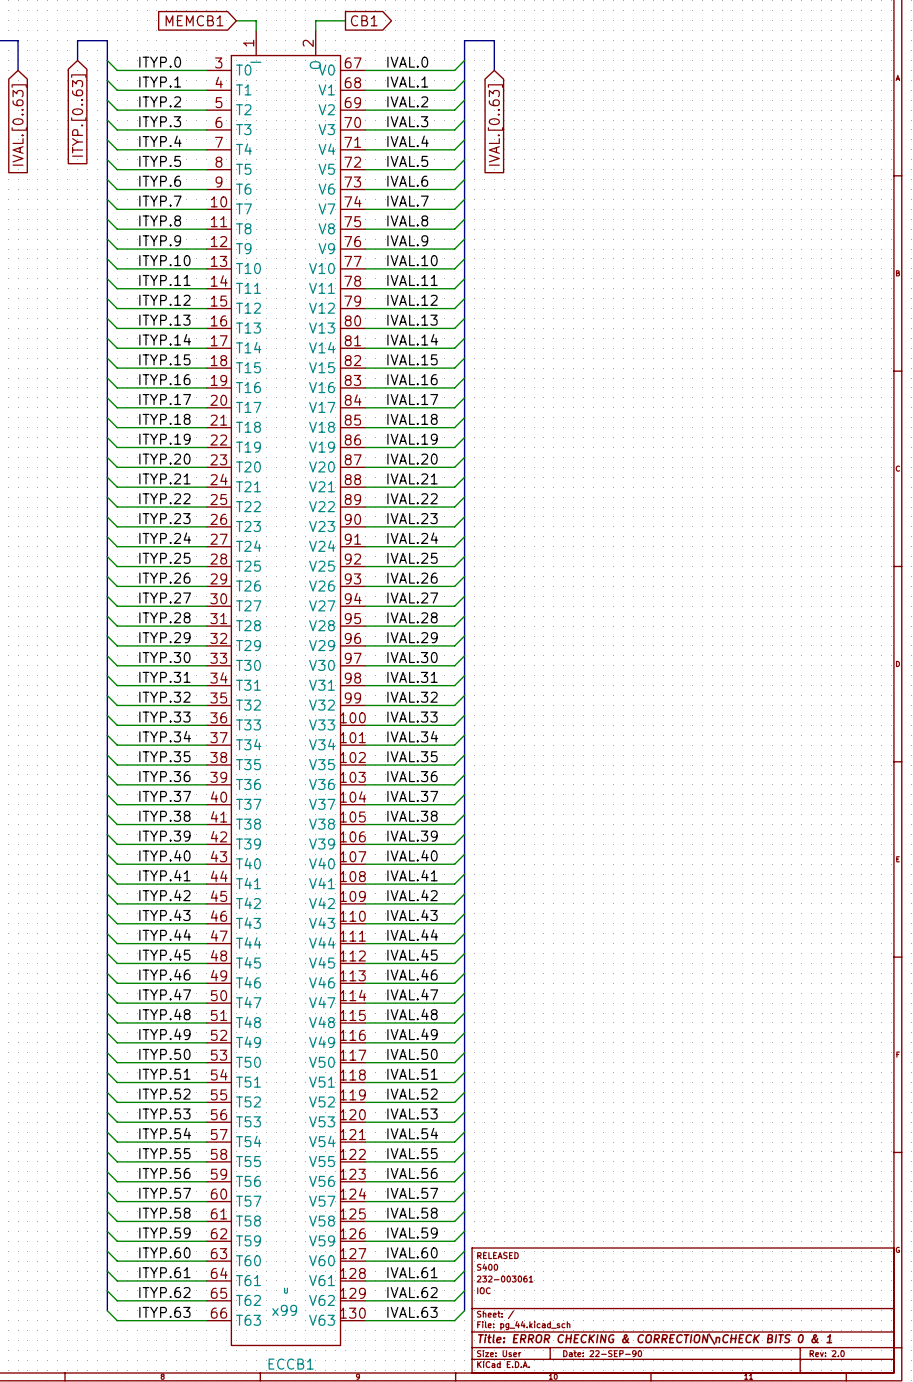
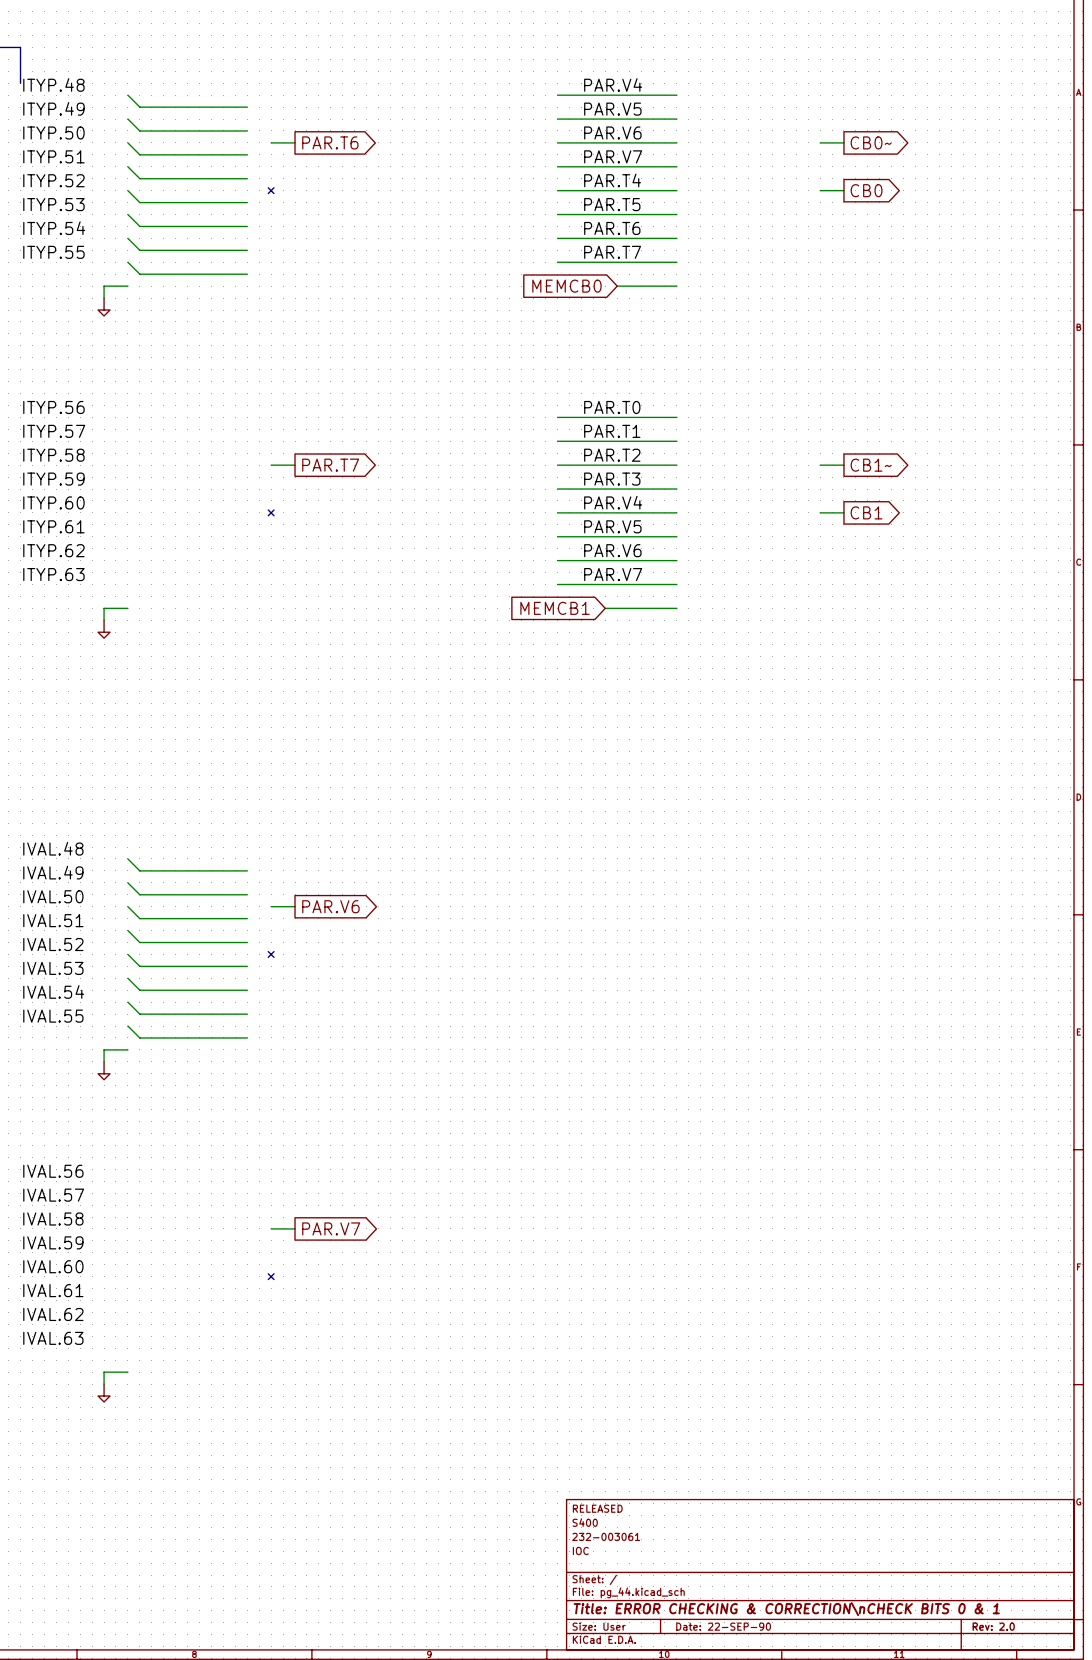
global label: MEMCB1 (194, 20) -> none
wire: (236, 20) (256, 20) (256, 30) -> none
wire: (345, 20) (315, 20) (315, 30) -> none
global label: CB1 (364, 20) -> none
bus: (77, 60) (77, 40) (107, 40) (107, 1310) -> none
wire: (107, 60) (117, 70) (206, 70) -> none
wire: (464, 60) (454, 70) (365, 70) -> none
label: ITYP.0 (160, 62) -> none
label: IVAL.0 (407, 62) -> none
bus: (494, 70) (494, 40) (464, 40) (464, 1310) -> none
label: none -> ITYP.48 (53, 84)
label: none -> PAR.V4 (613, 84)
wire: (464, 80) (454, 90) (365, 90) -> (557, 95) (676, 95)
label: ITYP.1 (160, 82) -> none
label: IVAL.1 (407, 82) -> none
label: none -> ITYP.49 (53, 108)
label: none -> PAR.V5 (612, 109)
wire: (464, 100) (454, 110) (365, 110) -> (557, 119) (676, 119)
label: ITYP.2 (160, 101) -> none
label: IVAL.2 (407, 101) -> none
label: none -> ITYP.50 (53, 132)
label: none -> PAR.V6 (612, 132)
global label: ITYP.[0..63] (78, 115) -> none
wire: none -> (271, 142) (295, 142)
global label: none -> PAR.T6 (330, 142)
wire: (464, 120) (454, 129) (365, 129) -> (557, 142) (676, 142)
wire: none -> (820, 142) (843, 142)
global label: none -> CB0~ (871, 142)
label: ITYP.3 (160, 121) -> none
label: IVAL.3 (407, 121) -> none
global label: IVAL.[0..63] (19, 124) -> none
global label: IVAL.[0..63] (495, 124) -> none
label: none -> ITYP.51 (53, 156)
label: none -> PAR.V7 (613, 156)
wire: (464, 139) (454, 149) (365, 149) -> (557, 166) (676, 166)
label: ITYP.4 (160, 141) -> none
label: IVAL.4 (408, 141) -> none
label: none -> ITYP.52 (53, 180)
label: none -> PAR.T4 (612, 180)
no-connect mark: none -> (271, 190)
wire: (464, 159) (454, 169) (365, 169) -> (557, 190) (676, 190)
wire: none -> (820, 190) (843, 190)
global label: none -> CB0 (866, 190)
label: ITYP.5 (160, 161) -> none
label: IVAL.5 (407, 161) -> none
label: none -> ITYP.53 (53, 204)
label: none -> PAR.T5 (612, 204)
wire: (464, 179) (454, 189) (365, 189) -> (557, 214) (676, 214)
label: ITYP.6 (160, 181) -> none
label: IVAL.6 (407, 181) -> none
label: none -> ITYP.54 (54, 228)
label: none -> PAR.T6 (612, 228)
wire: (464, 199) (454, 209) (365, 209) -> (557, 238) (676, 238)
label: ITYP.7 (160, 201) -> none
label: IVAL.7 (408, 201) -> none
label: none -> ITYP.55 (53, 252)
label: none -> PAR.T7 (612, 252)
wire: (464, 219) (454, 229) (365, 229) -> (557, 262) (676, 262)
label: ITYP.8 (160, 220) -> none
label: IVAL.8 (407, 220) -> none
wire: (107, 239) (117, 249) (206, 249) -> (127, 286) (104, 286) (104, 298)
wire: (464, 239) (454, 249) (365, 249) -> none
global label: none -> MEMCB0 (566, 286)
wire: none -> (617, 286) (676, 286)
label: ITYP.9 (160, 240) -> none
label: IVAL.9 (407, 240) -> none
power symbol: none -> (104, 307)
wire: (107, 258) (117, 268) (206, 268) -> none
wire: (464, 258) (454, 268) (365, 268) -> none
label: ITYP.10 (164, 260) -> none
label: IVAL.10 (412, 260) -> none
wire: (107, 278) (117, 288) (206, 288) -> none
wire: (464, 278) (454, 288) (365, 288) -> none
label: ITYP.11 (164, 280) -> none
label: IVAL.11 (412, 280) -> none
wire: (107, 298) (117, 308) (206, 308) -> none
wire: (464, 298) (454, 308) (365, 308) -> none
label: ITYP.12 (164, 300) -> none
label: IVAL.12 (412, 300) -> none
wire: (107, 318) (117, 328) (206, 328) -> none
wire: (464, 318) (454, 328) (365, 328) -> none
label: ITYP.13 (164, 320) -> none
label: IVAL.13 (412, 320) -> none
wire: (107, 338) (117, 348) (206, 348) -> none
wire: (464, 338) (454, 348) (365, 348) -> none
label: ITYP.14 (165, 339) -> none
label: IVAL.14 (412, 339) -> none
label: none -> ITYP.56 (53, 407)
label: none -> PAR.T0 (612, 407)
wire: none -> (557, 417) (676, 417)
wire: (107, 358) (117, 368) (206, 368) -> none
wire: (464, 358) (454, 368) (365, 368) -> none
label: none -> ITYP.57 (54, 431)
label: ITYP.15 (164, 359) -> none
label: IVAL.15 (412, 359) -> none
label: none -> PAR.T1 (612, 431)
wire: none -> (557, 441) (676, 441)
wire: (107, 378) (117, 387) (206, 387) -> none
wire: (464, 378) (454, 387) (365, 387) -> none
label: none -> ITYP.58 (53, 455)
label: ITYP.16 (164, 379) -> none
label: IVAL.16 (412, 379) -> none
label: none -> PAR.T2 (612, 455)
wire: none -> (271, 465) (295, 465)
global label: none -> PAR.T7 (330, 465)
wire: none -> (557, 465) (676, 465)
wire: none -> (820, 465) (843, 465)
global label: none -> CB1~ (871, 465)
wire: (107, 397) (117, 407) (206, 407) -> none
wire: (464, 397) (454, 407) (365, 407) -> none
label: none -> ITYP.59 (53, 479)
label: ITYP.17 (165, 399) -> none
label: IVAL.17 (412, 399) -> none
label: none -> PAR.T3 (612, 479)
wire: none -> (557, 489) (676, 489)
wire: (107, 417) (117, 427) (206, 427) -> none
wire: (464, 417) (454, 427) (365, 427) -> none
label: none -> ITYP.60 (53, 502)
label: ITYP.18 (164, 419) -> none
label: IVAL.18 (412, 419) -> none
label: none -> PAR.V4 (613, 502)
no-connect mark: none -> (271, 512)
wire: none -> (557, 512) (676, 512)
wire: none -> (820, 512) (843, 512)
global label: none -> CB1 (866, 512)
wire: (107, 437) (117, 447) (206, 447) -> none
wire: (464, 437) (454, 447) (365, 447) -> none
label: none -> ITYP.61 (53, 526)
label: ITYP.19 (164, 439) -> none
label: IVAL.19 (412, 439) -> none
label: none -> PAR.V5 (612, 526)
wire: none -> (557, 536) (676, 536)
wire: (107, 457) (117, 467) (206, 467) -> none
wire: (464, 457) (454, 467) (365, 467) -> none
label: none -> ITYP.62 (53, 550)
label: ITYP.20 (164, 459) -> none
label: IVAL.20 (412, 459) -> none
label: none -> PAR.V6 (612, 550)
wire: none -> (557, 560) (676, 560)
wire: (107, 477) (117, 487) (206, 487) -> none
wire: (464, 477) (454, 487) (365, 487) -> none
label: none -> ITYP.63 (53, 574)
label: ITYP.21 (164, 478) -> none
label: IVAL.21 (412, 478) -> none
label: none -> PAR.V7 (613, 574)
wire: none -> (557, 584) (676, 584)
wire: (107, 497) (117, 507) (206, 507) -> none
wire: (464, 497) (454, 507) (365, 507) -> none
label: ITYP.22 (164, 498) -> none
label: IVAL.22 (412, 498) -> none
wire: none -> (127, 608) (104, 608) (104, 620)
global label: none -> MEMCB1 (555, 608)
wire: none -> (605, 608) (676, 608)
wire: (107, 516) (117, 526) (206, 526) -> none
wire: (464, 516) (454, 526) (365, 526) -> none
label: ITYP.23 (164, 518) -> none
label: IVAL.23 (412, 518) -> none
power symbol: none -> (104, 629)
wire: (107, 536) (117, 546) (206, 546) -> none
wire: (464, 536) (454, 546) (365, 546) -> none
label: ITYP.24 (165, 538) -> none
label: IVAL.24 (412, 538) -> none
wire: (107, 556) (117, 566) (206, 566) -> none
wire: (464, 556) (454, 566) (365, 566) -> none
label: ITYP.25 (164, 558) -> none
label: IVAL.25 (412, 558) -> none
wire: (107, 576) (117, 586) (206, 586) -> none
wire: (464, 576) (454, 586) (365, 586) -> none
label: ITYP.26 (164, 578) -> none
label: IVAL.26 (412, 578) -> none
wire: (107, 596) (117, 606) (206, 606) -> none
wire: (464, 596) (454, 606) (365, 606) -> none
label: ITYP.27 (165, 597) -> none
label: IVAL.27 (412, 597) -> none
wire: (107, 616) (117, 626) (206, 626) -> none
wire: (464, 616) (454, 626) (365, 626) -> none
label: ITYP.28 (164, 617) -> none
label: IVAL.28 (412, 617) -> none
wire: (107, 636) (117, 645) (206, 645) -> none
wire: (464, 636) (454, 645) (365, 645) -> none
label: ITYP.29 (164, 637) -> none
label: IVAL.29 (412, 637) -> none
wire: (107, 655) (117, 665) (206, 665) -> none
wire: (464, 655) (454, 665) (365, 665) -> none
label: ITYP.30 (164, 657) -> none
label: IVAL.30 (412, 657) -> none
wire: (107, 675) (117, 685) (206, 685) -> none
wire: (464, 675) (454, 685) (365, 685) -> none
label: ITYP.31 (164, 677) -> none
label: IVAL.31 (412, 677) -> none
part: (285, 688) -> none
wire: (107, 695) (117, 705) (206, 705) -> none
wire: (464, 695) (454, 705) (365, 705) -> none
label: ITYP.32 (164, 697) -> none
label: IVAL.32 (412, 697) -> none
label: none -> IVAL.48 (53, 848)
wire: (464, 715) (454, 725) (365, 725) -> none
label: ITYP.33 (164, 717) -> none
label: IVAL.33 (412, 717) -> none
label: none -> IVAL.49 (53, 872)
wire: (464, 735) (454, 745) (365, 745) -> none
label: ITYP.34 (165, 736) -> none
label: IVAL.34 (412, 736) -> none
label: none -> IVAL.50 (53, 896)
wire: none -> (271, 906) (295, 906)
global label: none -> PAR.V6 (330, 906)
wire: (464, 755) (454, 765) (365, 765) -> none
label: ITYP.35 (164, 756) -> none
label: IVAL.35 (412, 756) -> none
label: none -> IVAL.51 (53, 920)
wire: (464, 774) (454, 784) (365, 784) -> none
label: ITYP.36 (164, 776) -> none
label: IVAL.36 (412, 776) -> none
label: none -> IVAL.52 (53, 944)
no-connect mark: none -> (271, 954)
wire: (464, 794) (454, 804) (365, 804) -> none
label: ITYP.37 (165, 796) -> none
label: IVAL.37 (412, 796) -> none
label: none -> IVAL.53 (53, 968)
wire: (464, 814) (454, 824) (365, 824) -> none
label: ITYP.38 (164, 816) -> none
label: IVAL.38 (412, 816) -> none
label: none -> IVAL.54 (53, 991)
wire: (464, 834) (454, 844) (365, 844) -> none
label: ITYP.39 (164, 836) -> none
label: IVAL.39 (412, 836) -> none
label: none -> IVAL.55 (53, 1016)
wire: (464, 854) (454, 864) (365, 864) -> none
label: ITYP.40 (164, 855) -> none
label: IVAL.40 (412, 855) -> none
wire: (107, 874) (117, 884) (206, 884) -> (127, 1049) (104, 1049) (104, 1061)
wire: (464, 874) (454, 884) (365, 884) -> none
label: ITYP.41 (164, 875) -> none
label: IVAL.41 (412, 875) -> none
power symbol: none -> (104, 1070)
wire: (107, 893) (117, 903) (206, 903) -> none
wire: (464, 893) (454, 903) (365, 903) -> none
label: ITYP.42 (164, 895) -> none
label: IVAL.42 (412, 895) -> none
wire: (107, 913) (117, 923) (206, 923) -> none
wire: (464, 913) (454, 923) (365, 923) -> none
label: ITYP.43 (164, 915) -> none
label: IVAL.43 (412, 915) -> none
wire: (107, 933) (117, 943) (206, 943) -> none
wire: (464, 933) (454, 943) (365, 943) -> none
label: ITYP.44 (165, 935) -> none
label: IVAL.44 (412, 935) -> none
wire: (107, 953) (117, 963) (206, 963) -> none
wire: (464, 953) (454, 963) (365, 963) -> none
label: ITYP.45 (164, 954) -> none
label: IVAL.45 (412, 954) -> none
wire: (107, 973) (117, 983) (206, 983) -> none
wire: (464, 973) (454, 983) (365, 983) -> none
label: ITYP.46 (164, 974) -> none
label: IVAL.46 (412, 974) -> none
label: none -> IVAL.56 (53, 1171)
wire: (107, 993) (117, 1003) (206, 1003) -> none
wire: (464, 993) (454, 1003) (365, 1003) -> none
label: none -> IVAL.57 (53, 1195)
label: ITYP.47 (165, 994) -> none
label: IVAL.47 (412, 994) -> none
wire: (107, 1013) (117, 1022) (206, 1022) -> none
wire: (464, 1013) (454, 1022) (365, 1022) -> none
label: none -> IVAL.58 (53, 1219)
label: ITYP.48 (164, 1014) -> none
label: IVAL.48 (412, 1014) -> none
wire: none -> (271, 1228) (295, 1228)
global label: none -> PAR.V7 (331, 1228)
wire: (107, 1032) (117, 1042) (206, 1042) -> none
wire: (464, 1032) (454, 1042) (365, 1042) -> none
label: none -> IVAL.59 (53, 1242)
label: ITYP.49 (164, 1034) -> none
label: IVAL.49 (412, 1034) -> none
wire: (107, 1052) (117, 1062) (206, 1062) -> none
wire: (464, 1052) (454, 1062) (365, 1062) -> none
label: none -> IVAL.60 (53, 1266)
label: ITYP.50 (164, 1054) -> none
label: IVAL.50 (412, 1054) -> none
no-connect mark: none -> (271, 1276)
wire: (107, 1072) (117, 1082) (206, 1082) -> none
wire: (464, 1072) (454, 1082) (365, 1082) -> none
label: none -> IVAL.61 (53, 1290)
label: ITYP.51 (164, 1074) -> none
label: IVAL.51 (412, 1074) -> none
wire: (107, 1092) (117, 1102) (206, 1102) -> none
wire: (464, 1092) (454, 1102) (365, 1102) -> none
label: none -> IVAL.62 (53, 1314)
label: ITYP.52 (164, 1094) -> none
label: IVAL.52 (412, 1094) -> none
wire: (107, 1112) (117, 1122) (206, 1122) -> none
wire: (464, 1112) (454, 1122) (365, 1122) -> none
label: none -> IVAL.63 (53, 1338)
label: ITYP.53 (164, 1113) -> none
label: IVAL.53 (412, 1113) -> none
wire: (107, 1132) (117, 1142) (206, 1142) -> none
wire: (464, 1132) (454, 1142) (365, 1142) -> none
label: ITYP.54 (165, 1133) -> none
label: IVAL.54 (412, 1133) -> none
wire: none -> (127, 1372) (104, 1372) (104, 1384)
wire: (107, 1151) (117, 1161) (206, 1161) -> none
wire: (464, 1151) (454, 1161) (365, 1161) -> none
label: ITYP.55 (164, 1153) -> none
label: IVAL.55 (412, 1153) -> none
power symbol: none -> (104, 1393)
wire: (107, 1171) (117, 1181) (206, 1181) -> none
wire: (464, 1171) (454, 1181) (365, 1181) -> none
label: ITYP.56 (164, 1173) -> none
label: IVAL.56 (412, 1173) -> none
wire: (107, 1191) (117, 1201) (206, 1201) -> none
wire: (464, 1191) (454, 1201) (365, 1201) -> none
label: ITYP.57 (165, 1193) -> none
label: IVAL.57 (412, 1193) -> none
wire: (107, 1211) (117, 1221) (206, 1221) -> none
wire: (464, 1211) (454, 1221) (365, 1221) -> none
label: ITYP.58 (164, 1213) -> none
label: IVAL.58 (412, 1213) -> none
wire: (107, 1231) (117, 1241) (206, 1241) -> none
wire: (464, 1231) (454, 1241) (365, 1241) -> none
label: ITYP.59 (164, 1233) -> none
label: IVAL.59 (412, 1233) -> none
wire: (107, 1251) (117, 1261) (206, 1261) -> none
wire: (464, 1251) (454, 1261) (365, 1261) -> none
label: ITYP.60 (164, 1252) -> none
label: IVAL.60 (412, 1252) -> none
wire: (107, 1271) (117, 1280) (206, 1280) -> none
wire: (464, 1271) (454, 1280) (365, 1280) -> none
label: ITYP.61 (164, 1272) -> none
label: IVAL.61 (412, 1272) -> none
wire: (107, 1290) (117, 1300) (206, 1300) -> none
wire: (464, 1290) (454, 1300) (365, 1300) -> none
label: ITYP.62 (164, 1292) -> none
label: IVAL.62 (412, 1292) -> none
wire: (107, 1310) (117, 1320) (206, 1320) -> none
wire: (464, 1310) (454, 1320) (365, 1320) -> none
label: ITYP.63 (164, 1312) -> none
label: IVAL.63 (412, 1312) -> none

